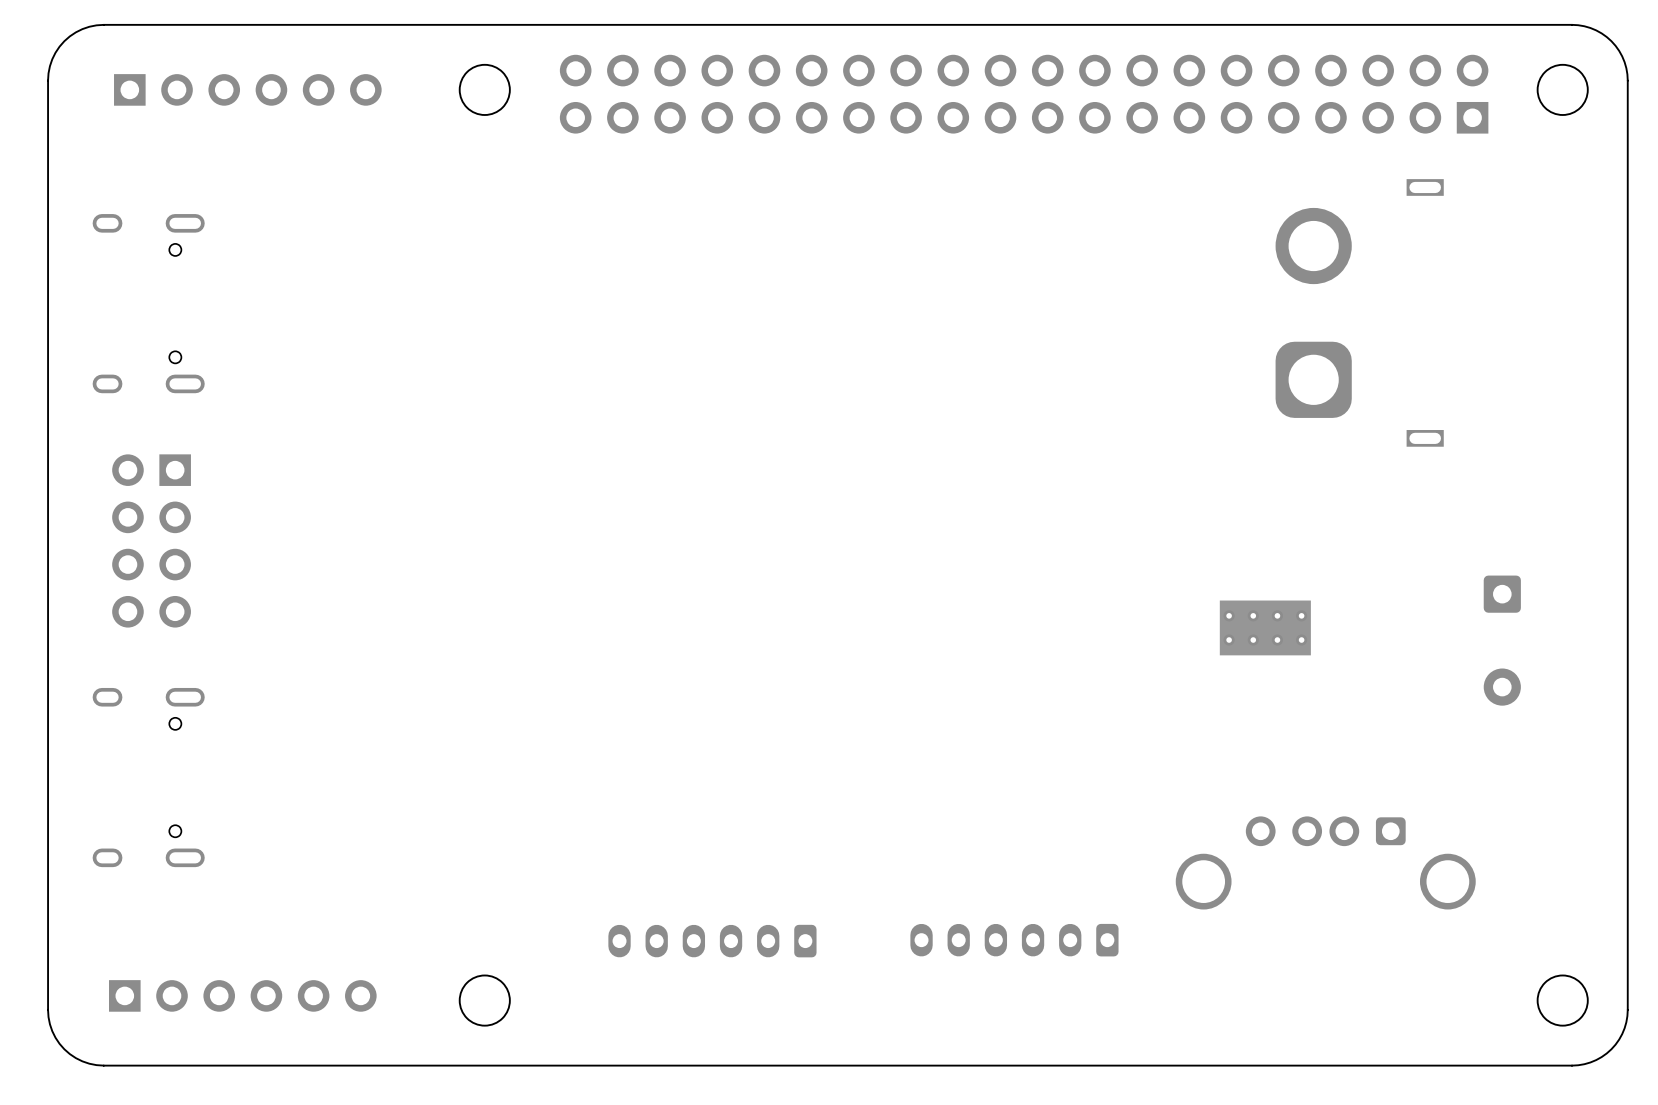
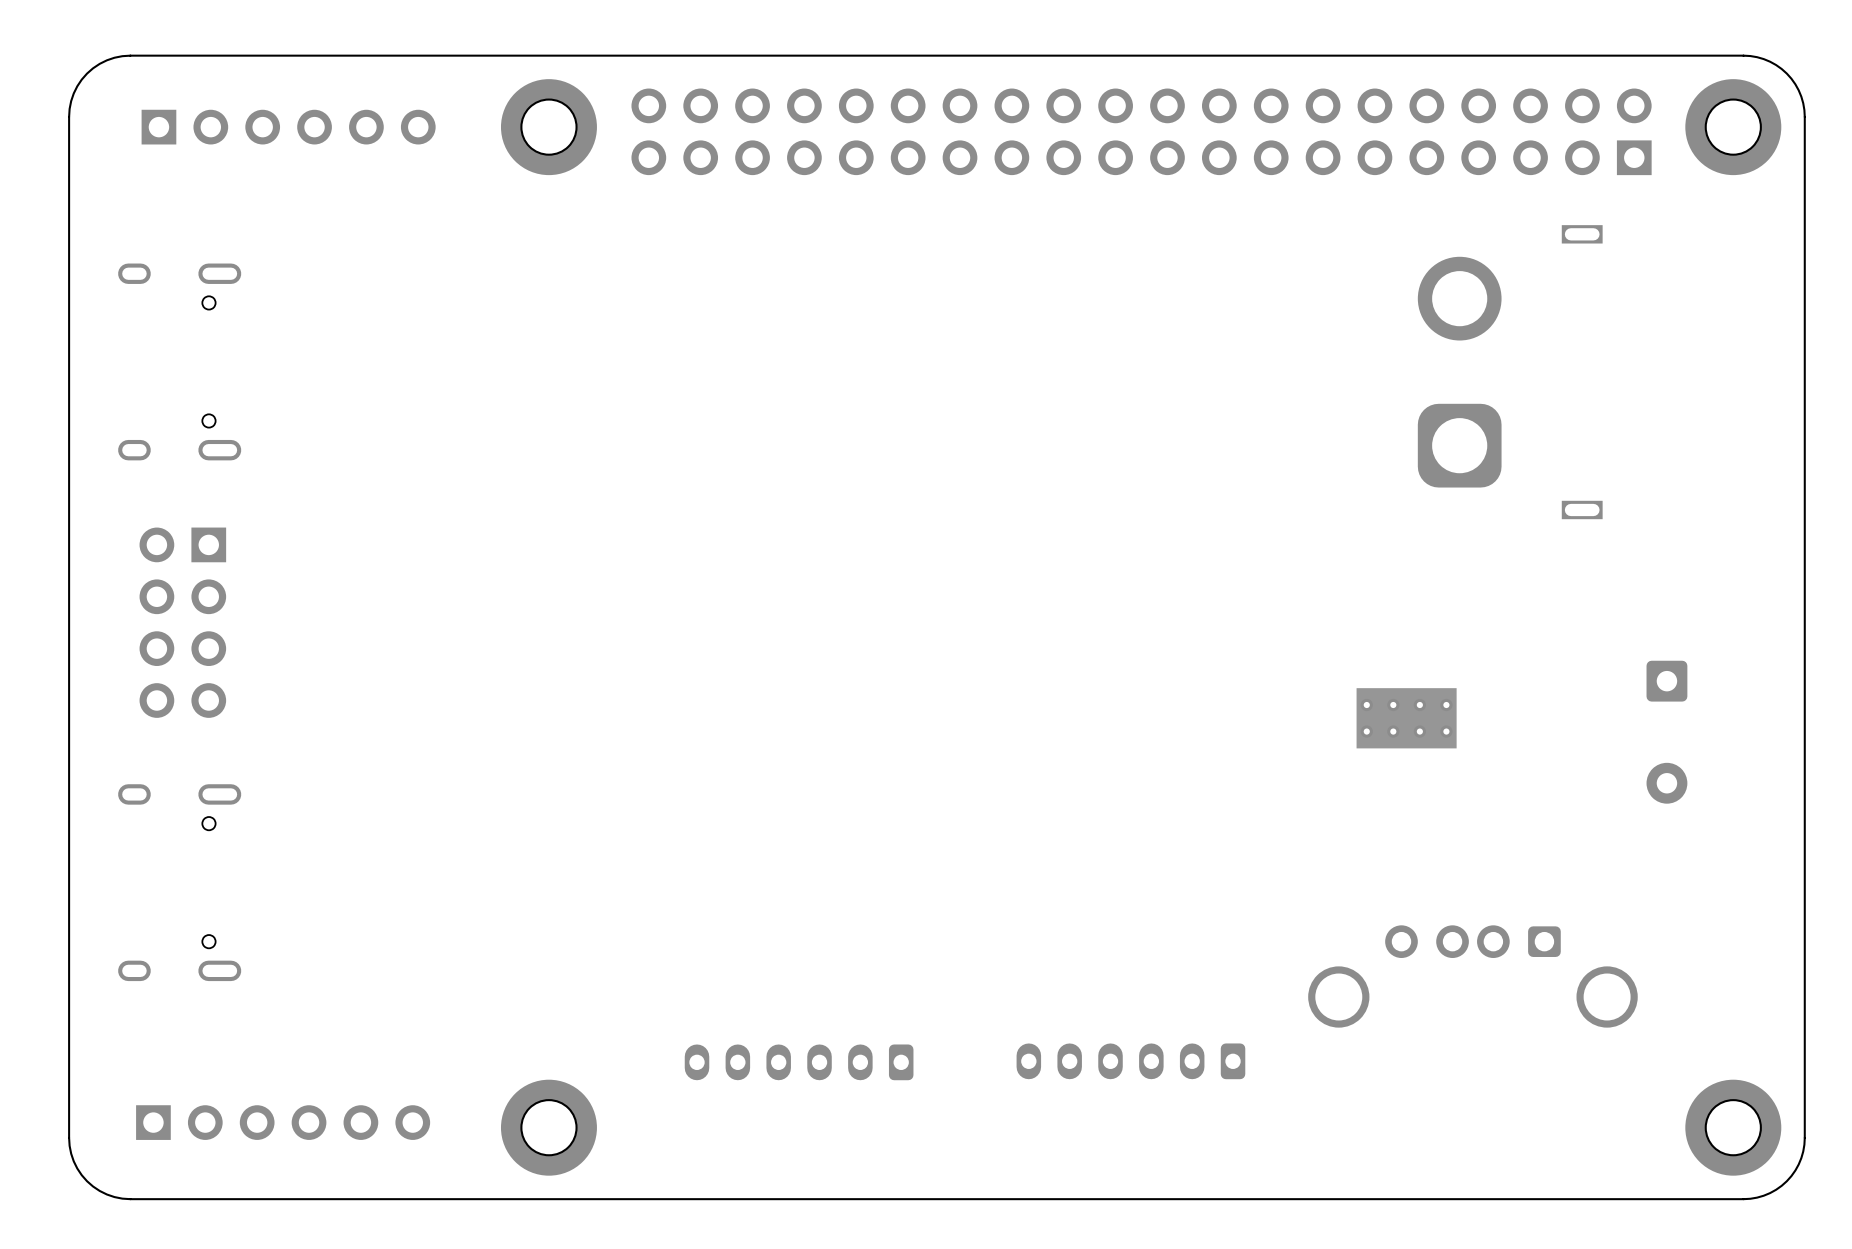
part: none -> (548, 127)
part: none -> (1733, 127)
part: none -> (548, 1127)
part: none -> (1733, 1127)

